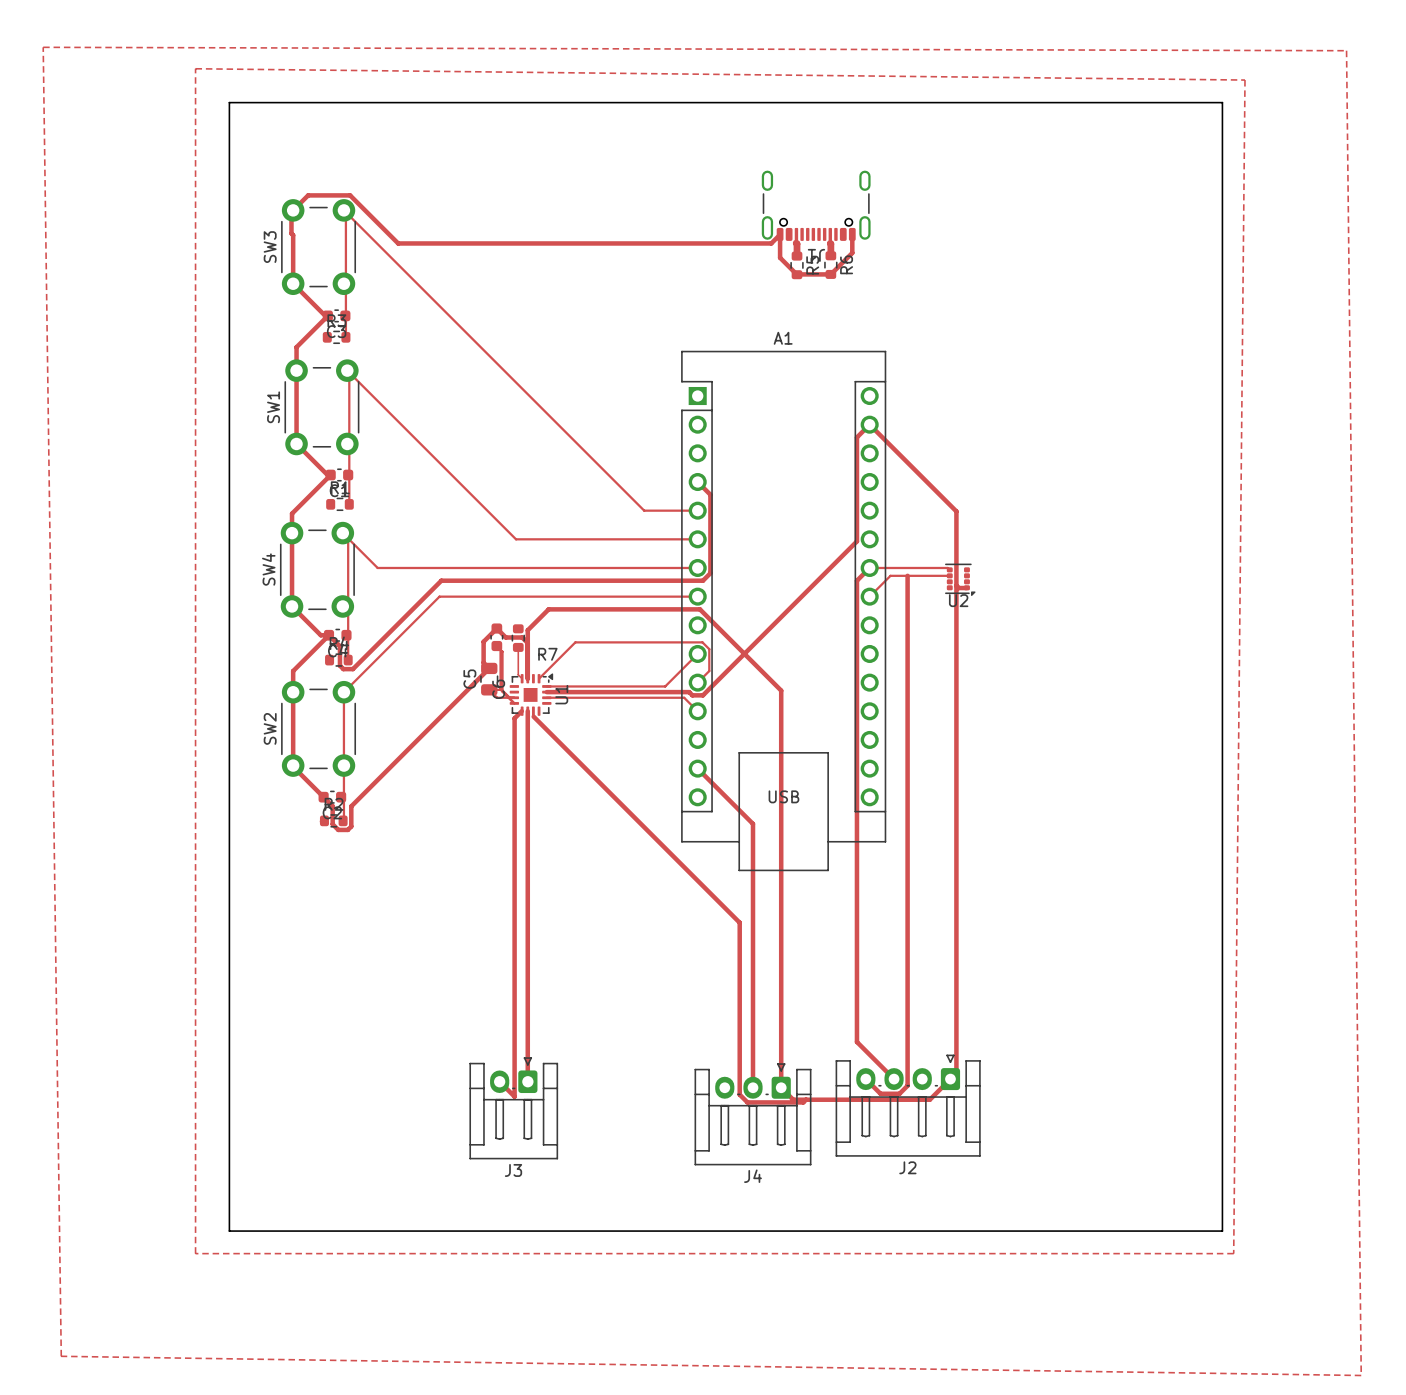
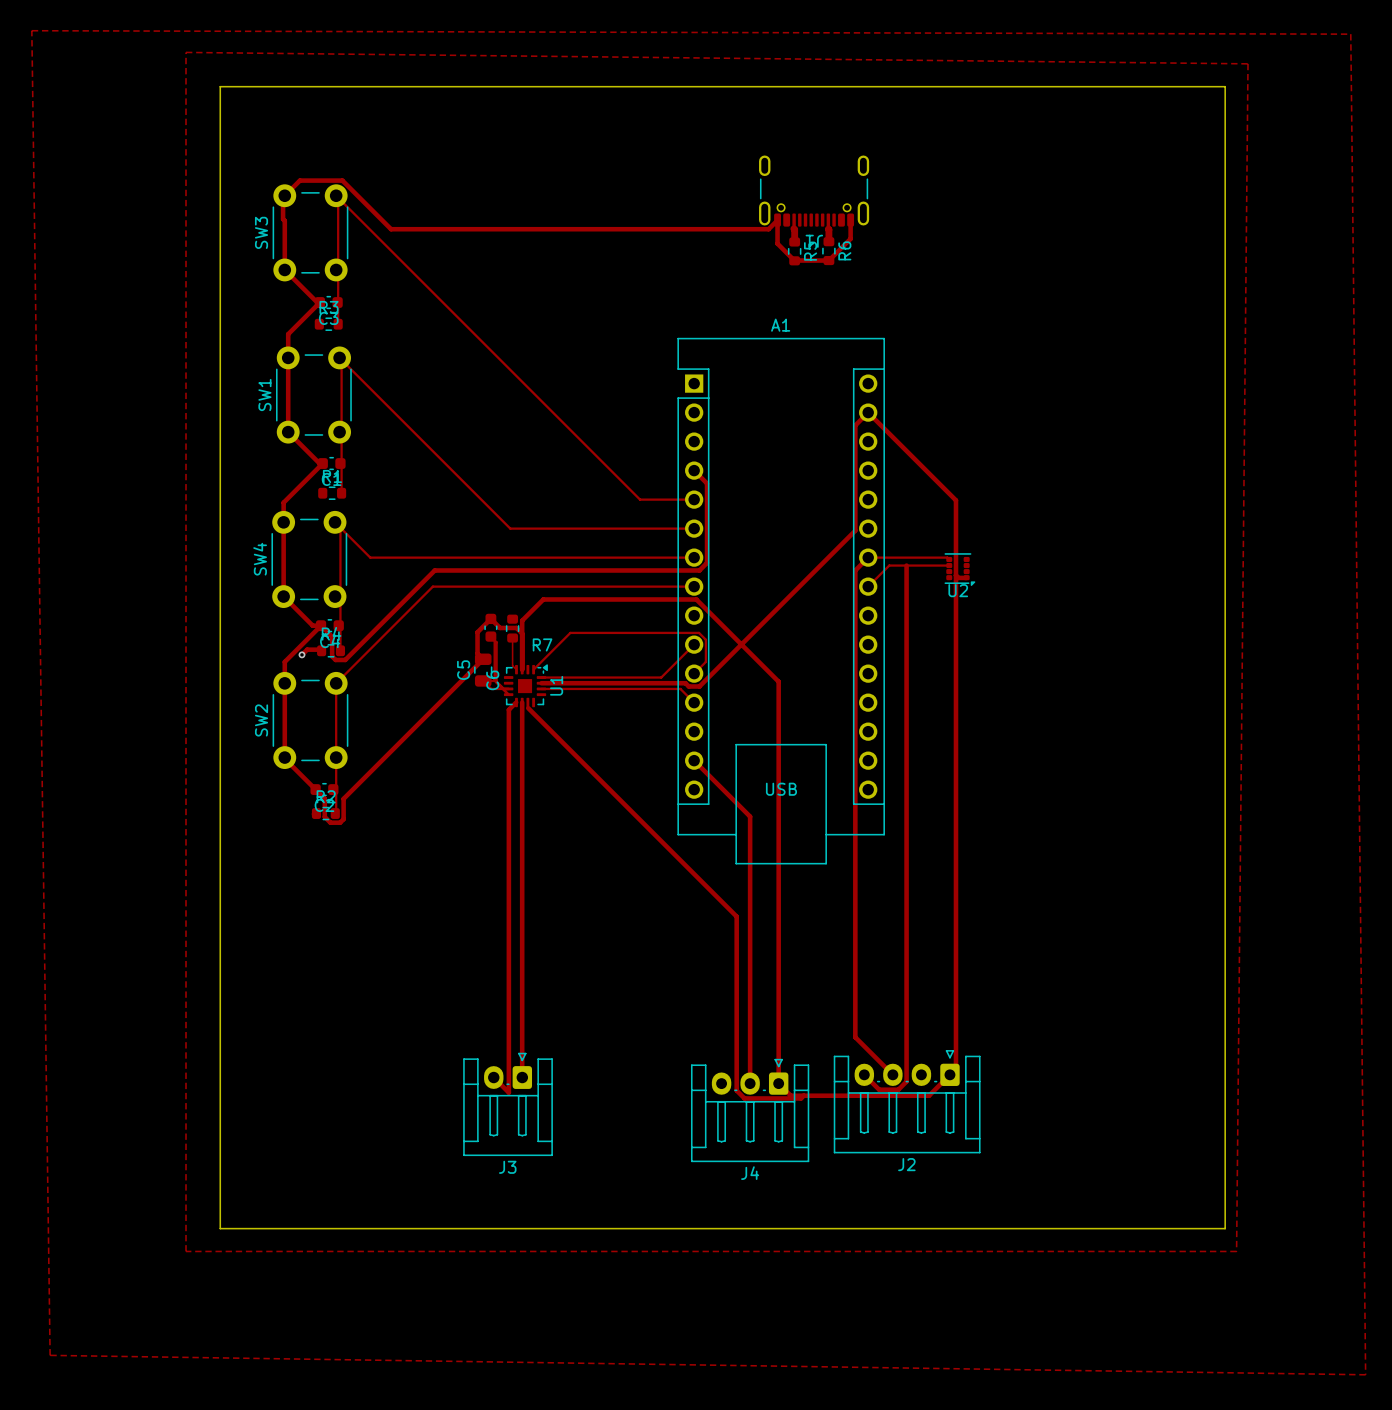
track: none -> (321, 650) (307, 649) (301, 654)
via: none -> (301, 654)

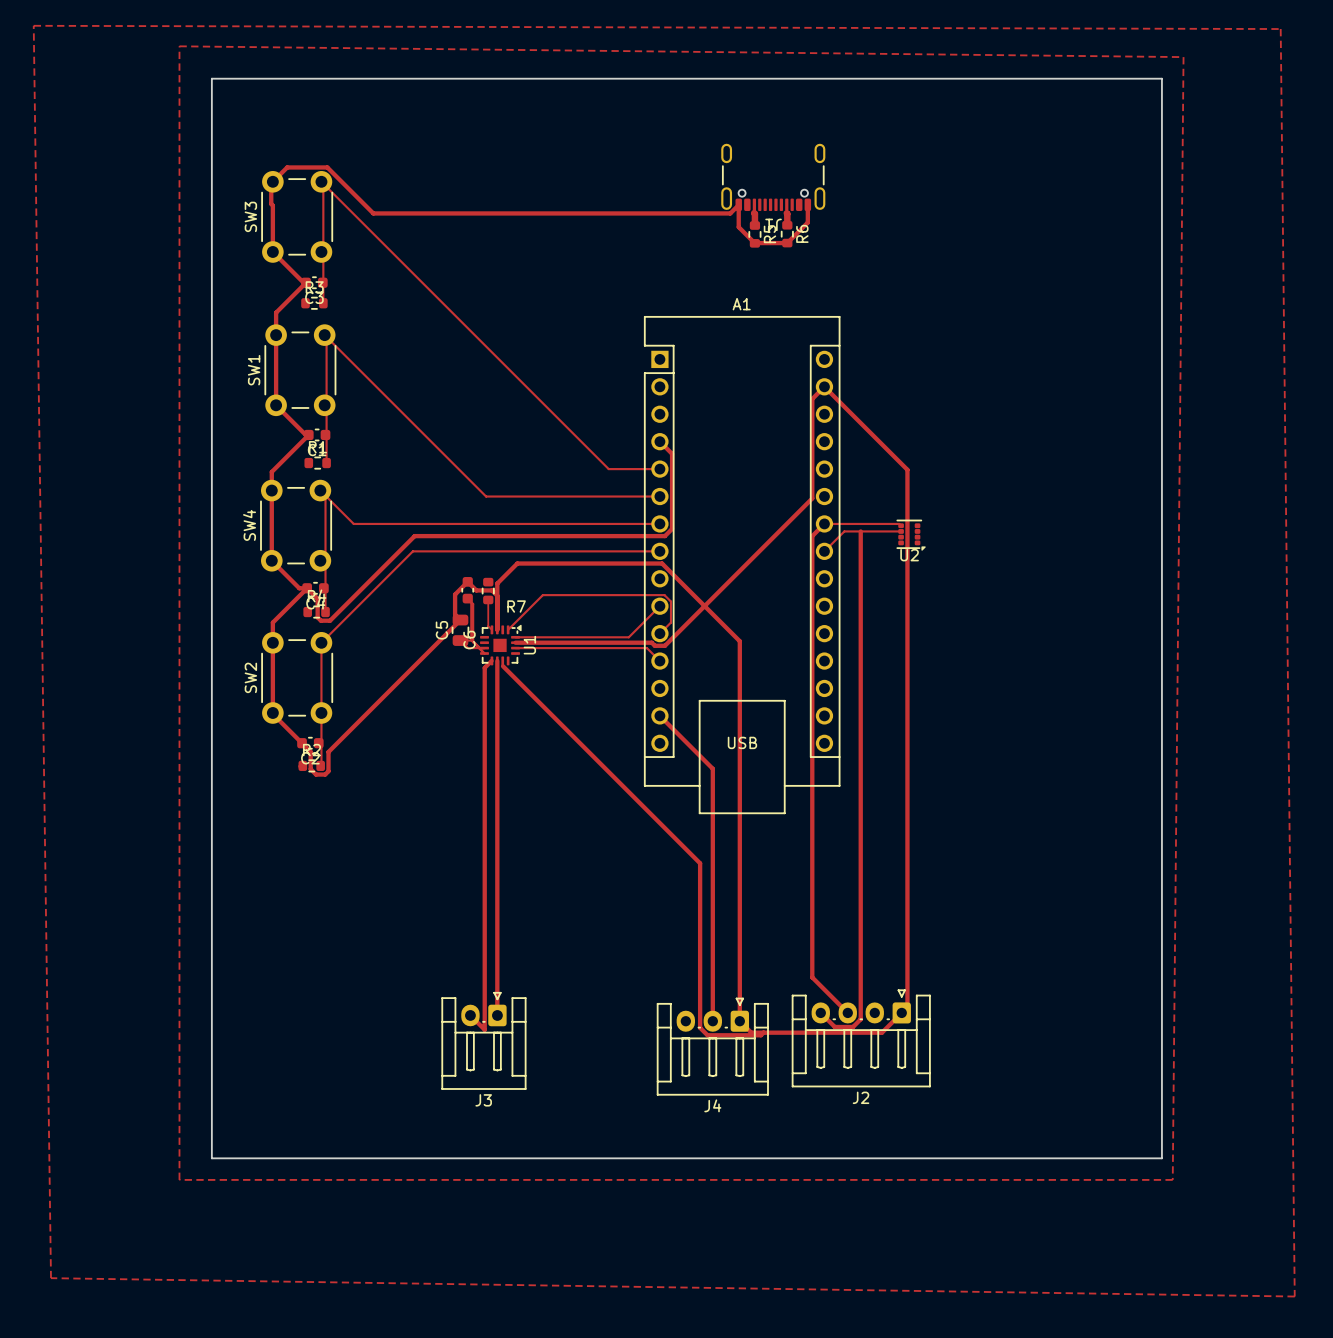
track: (955, 575) (958, 577) (966, 577) -> none
track: (321, 650) (307, 649) (301, 654) -> none
via: (301, 654) -> none

